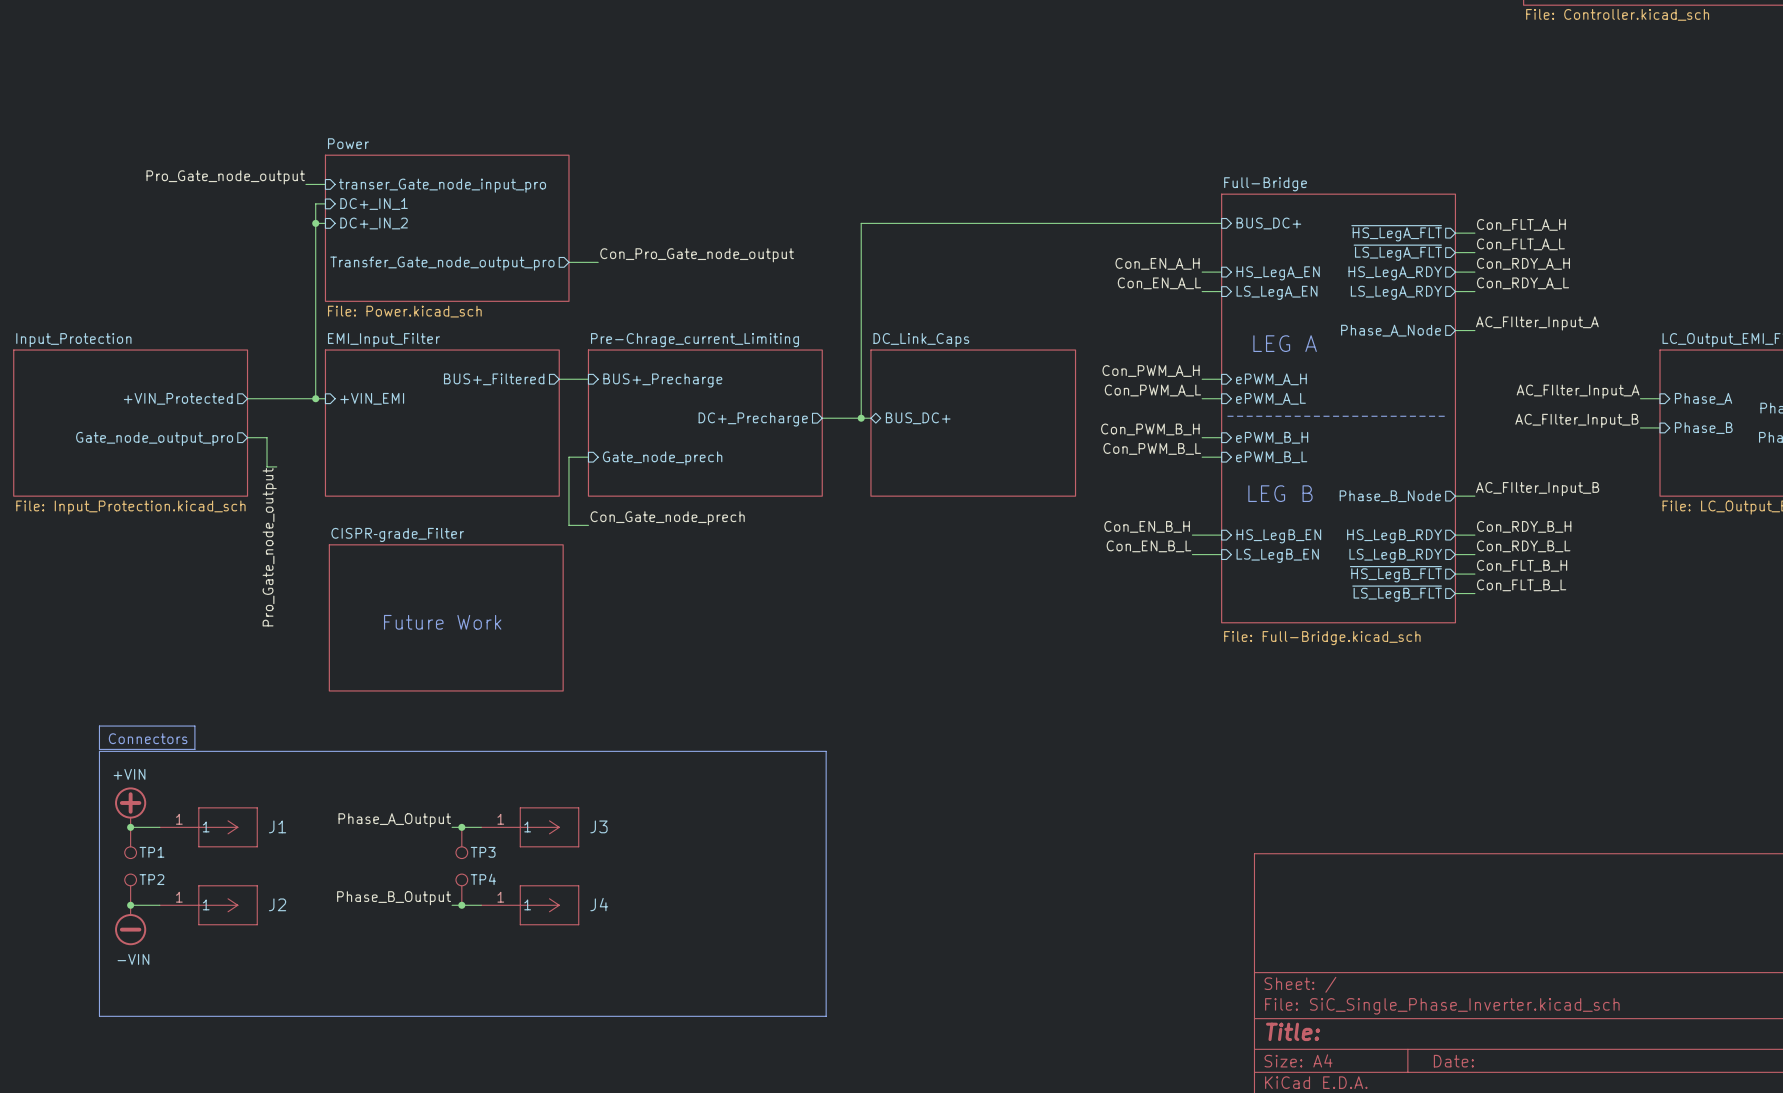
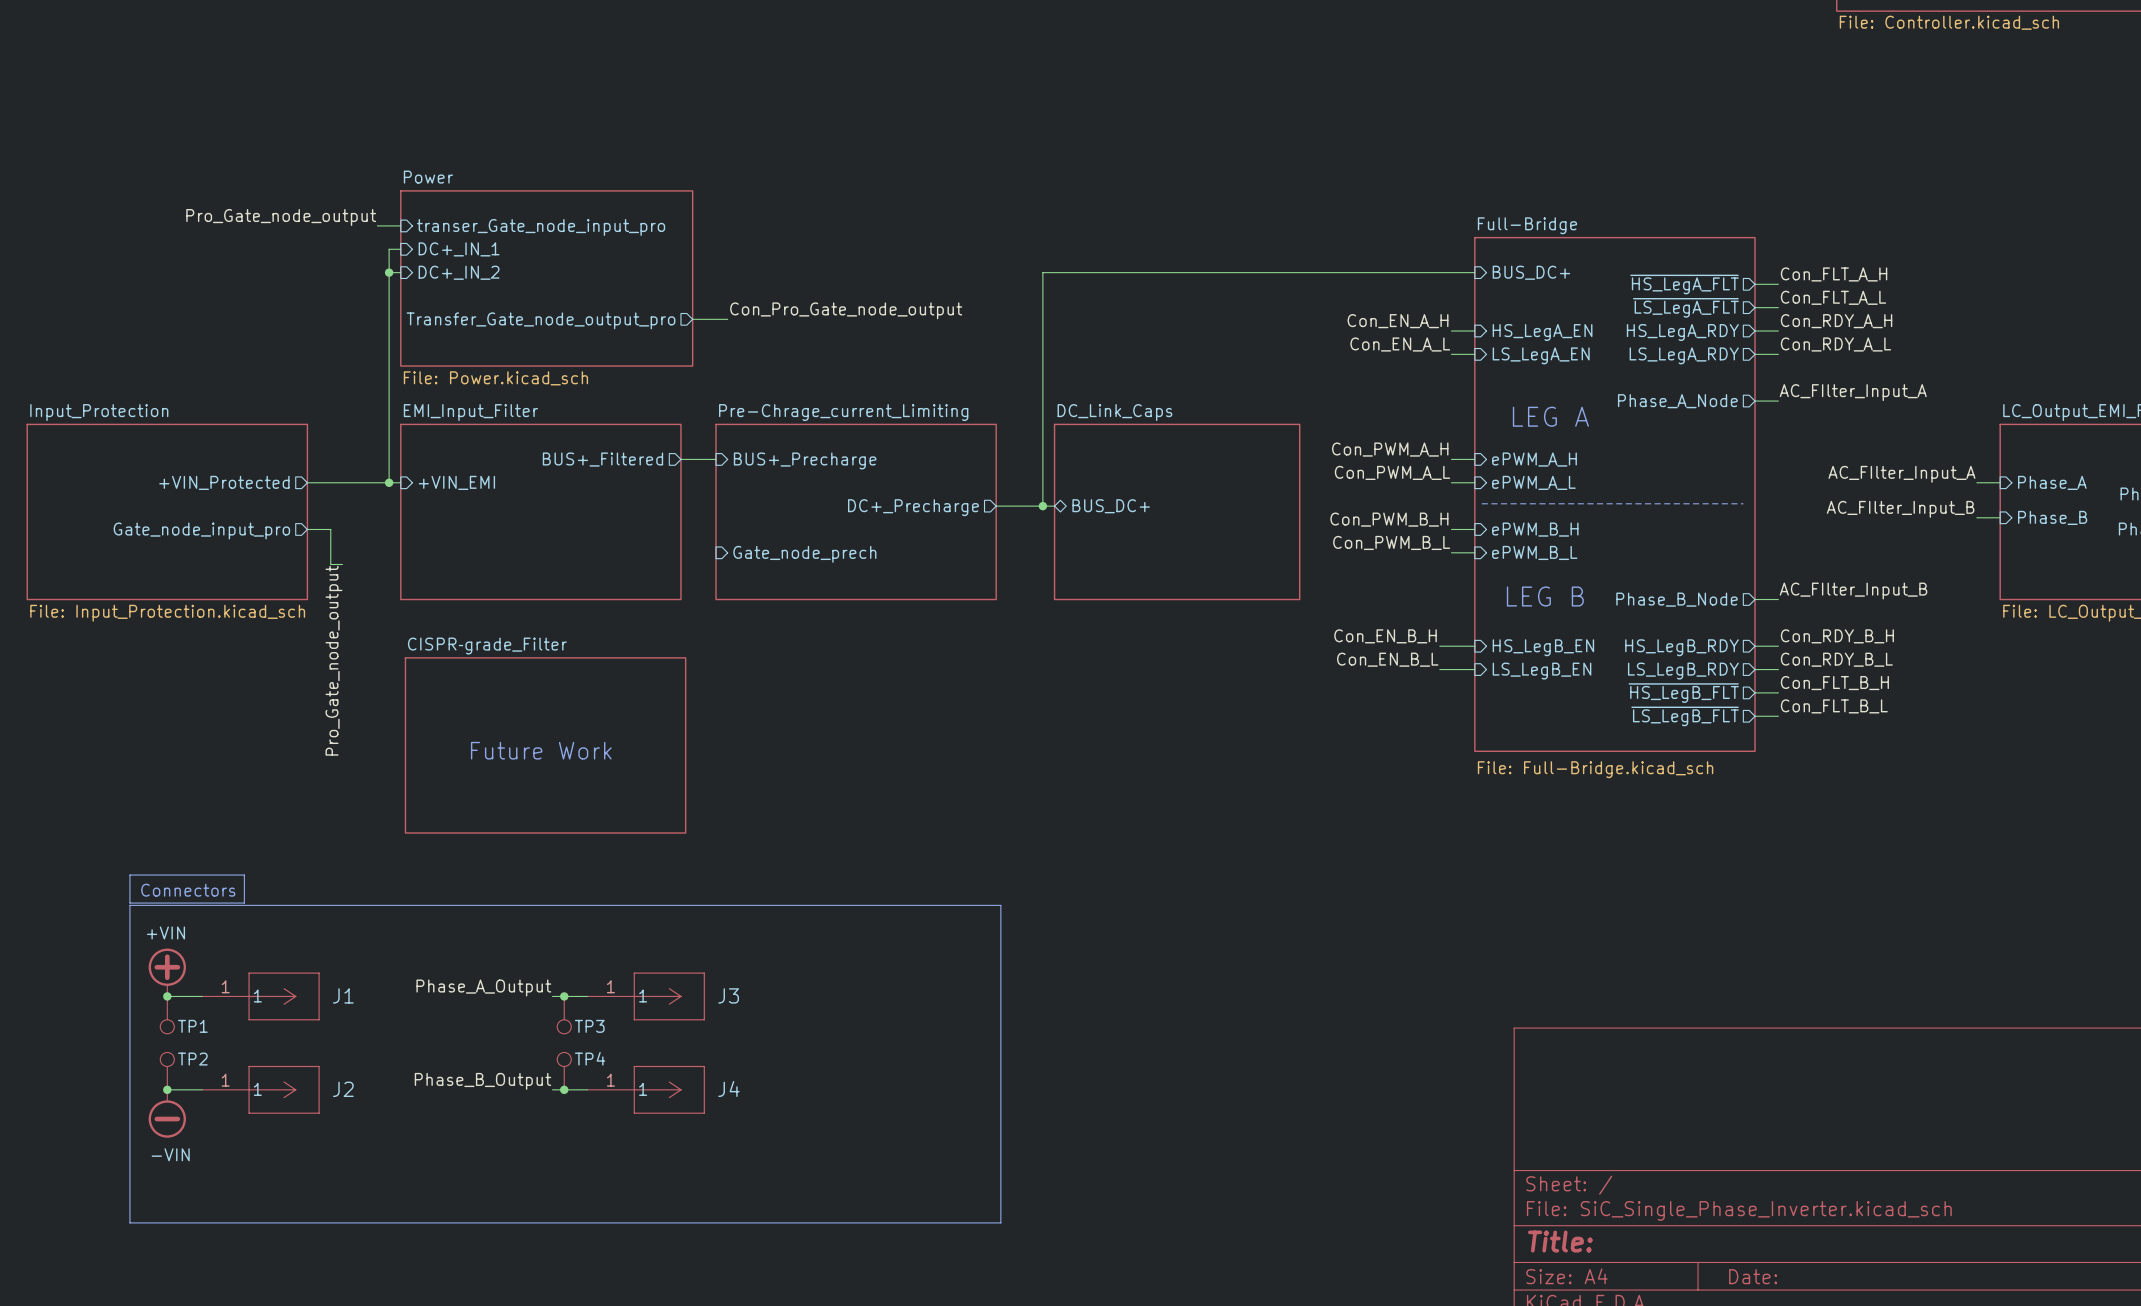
sheet pin: Gate_node_output_pro (154, 438) -> Gate_node_input_pro (201, 530)
wire: (588, 457) (568, 457) (568, 525) (588, 525) -> none
label: Con_Gate_node_prech (667, 518) -> none

